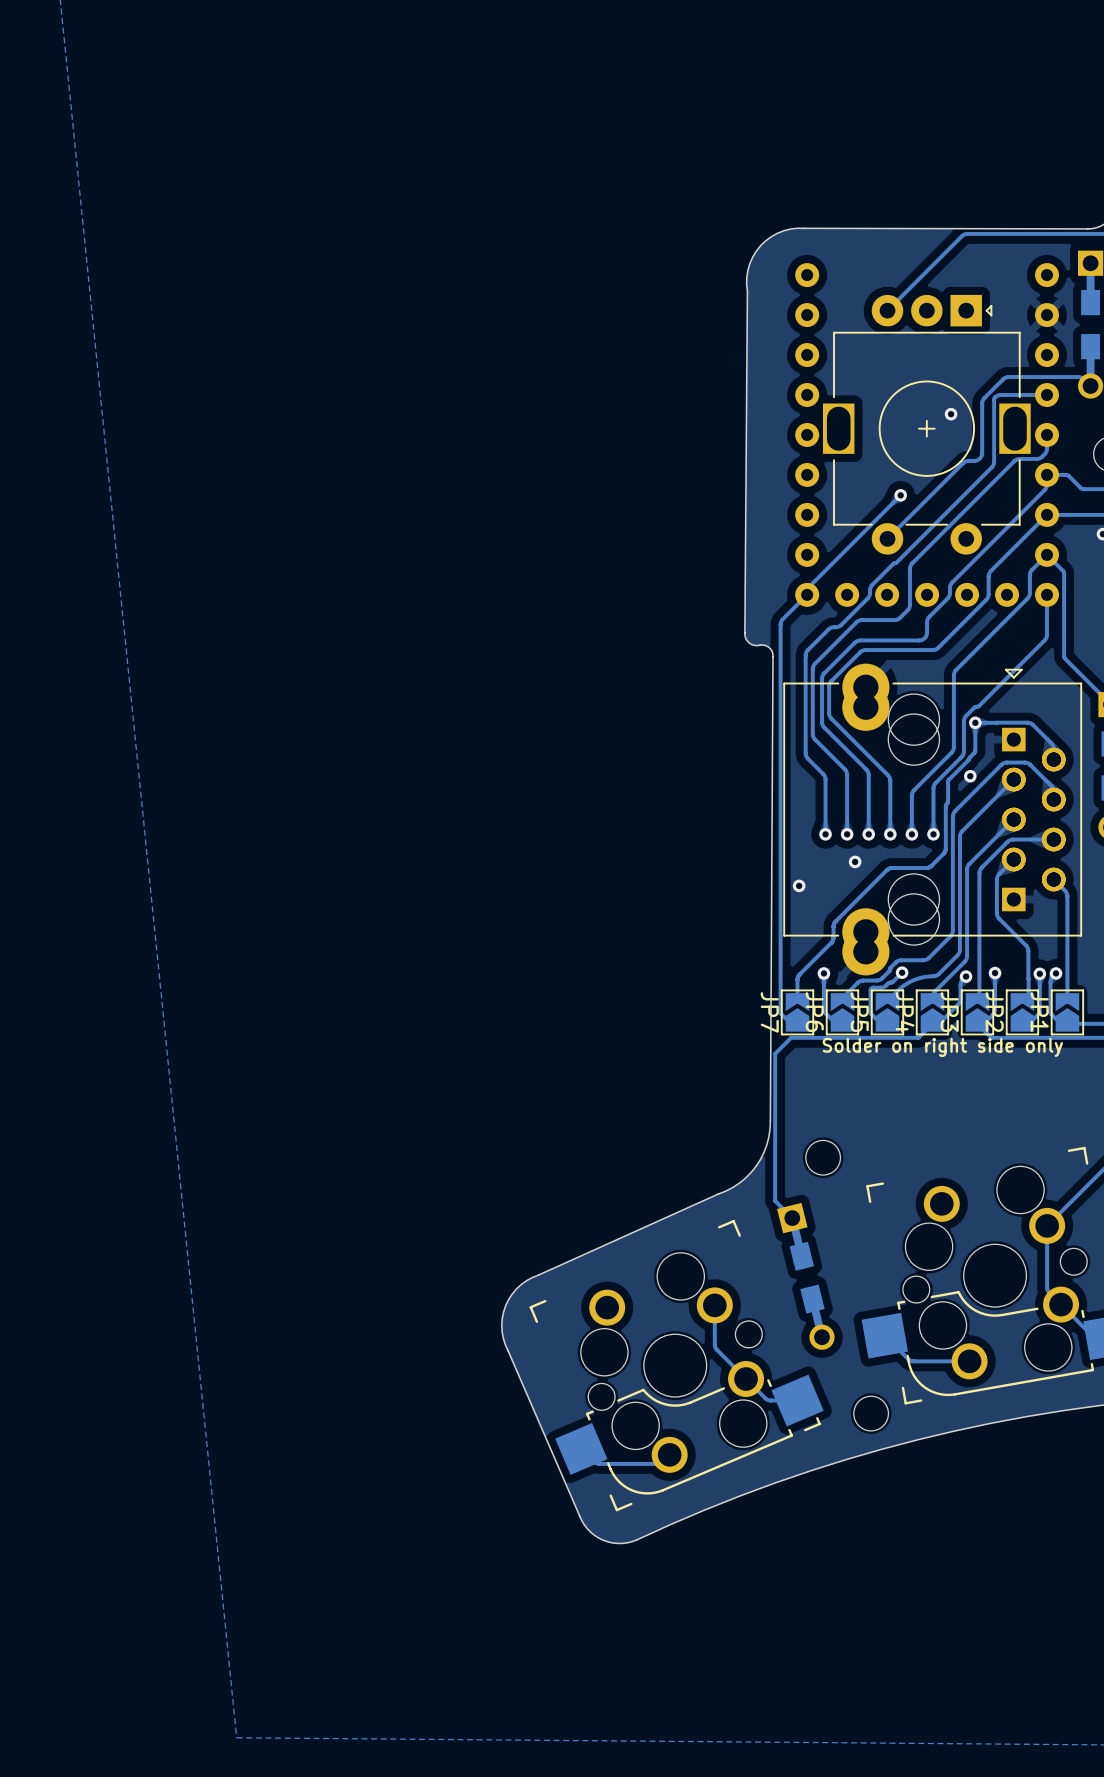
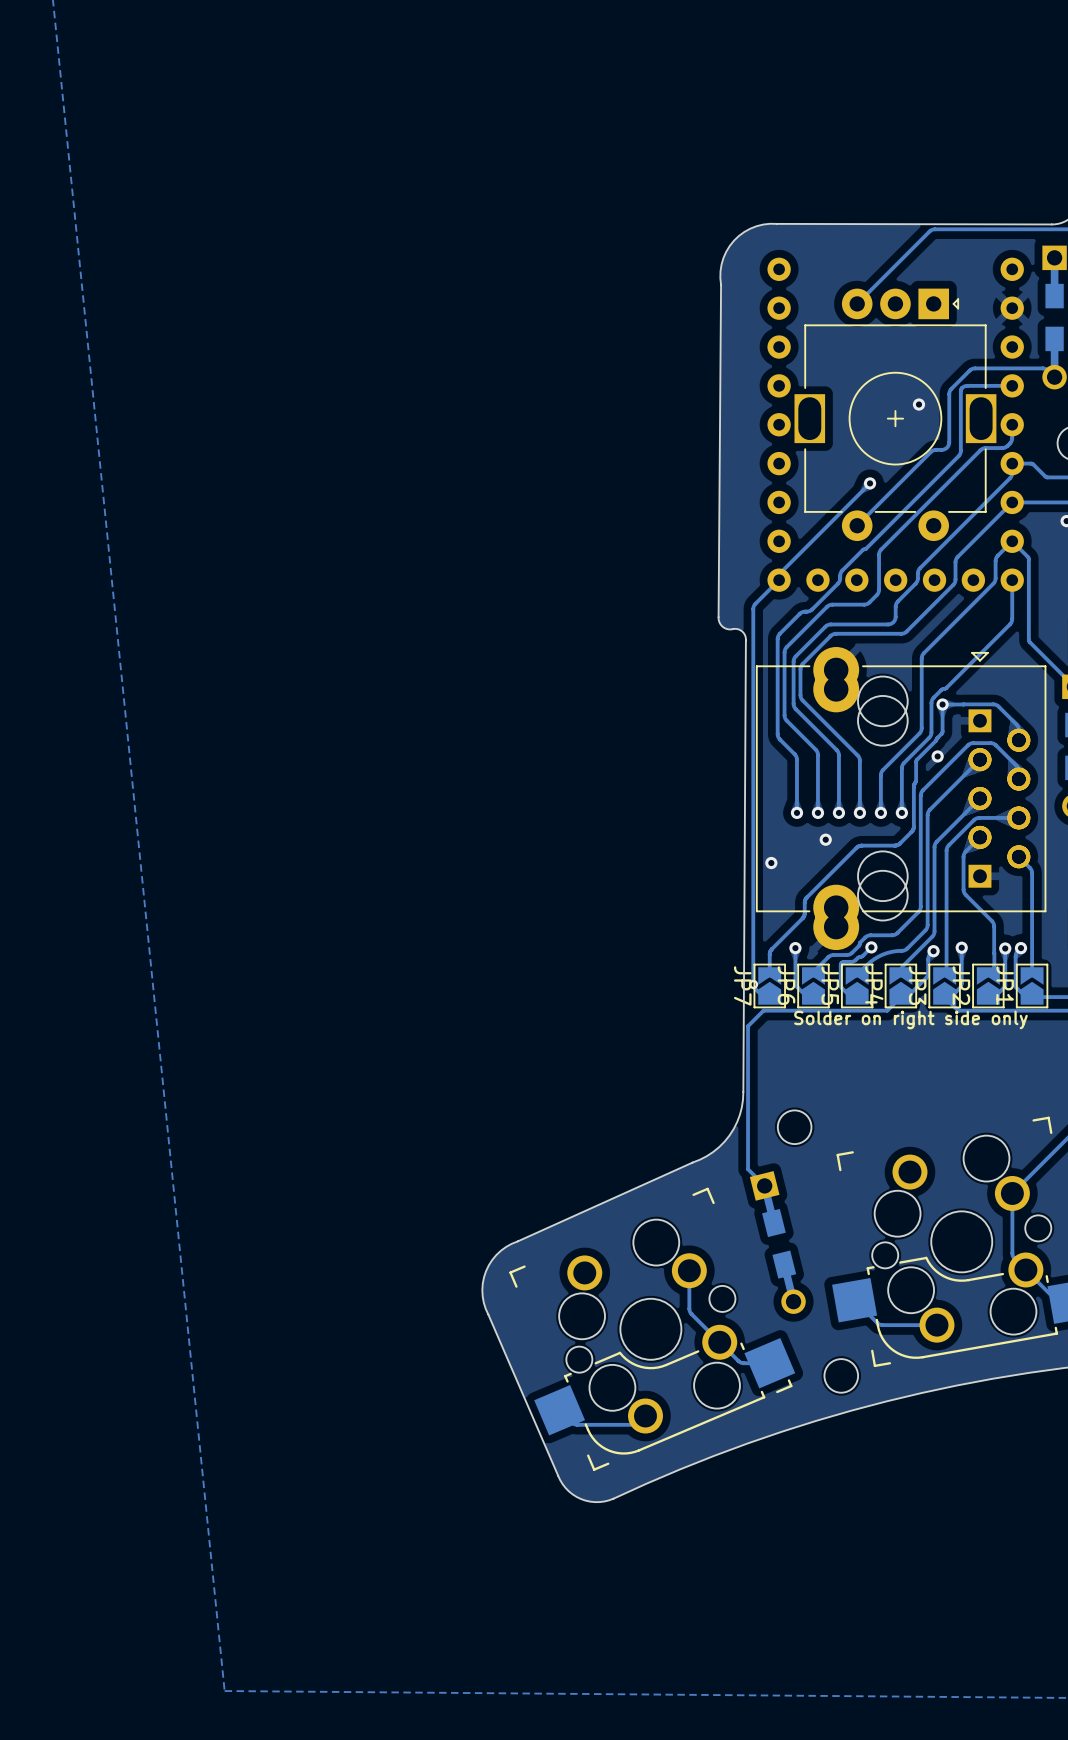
via: none -> (753, 984)

